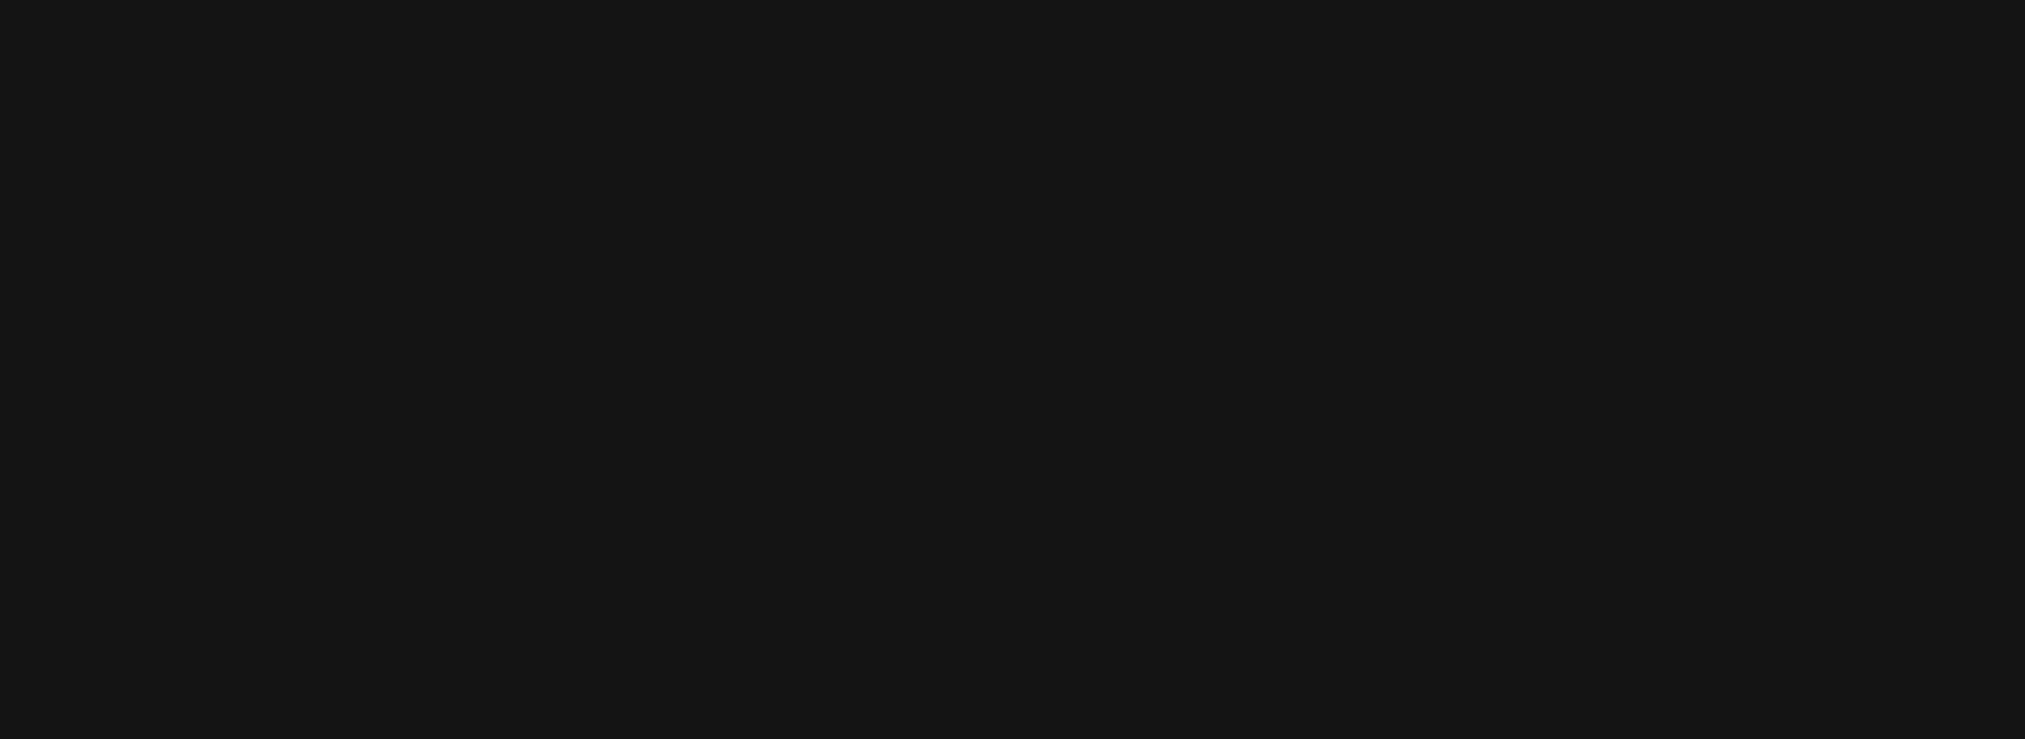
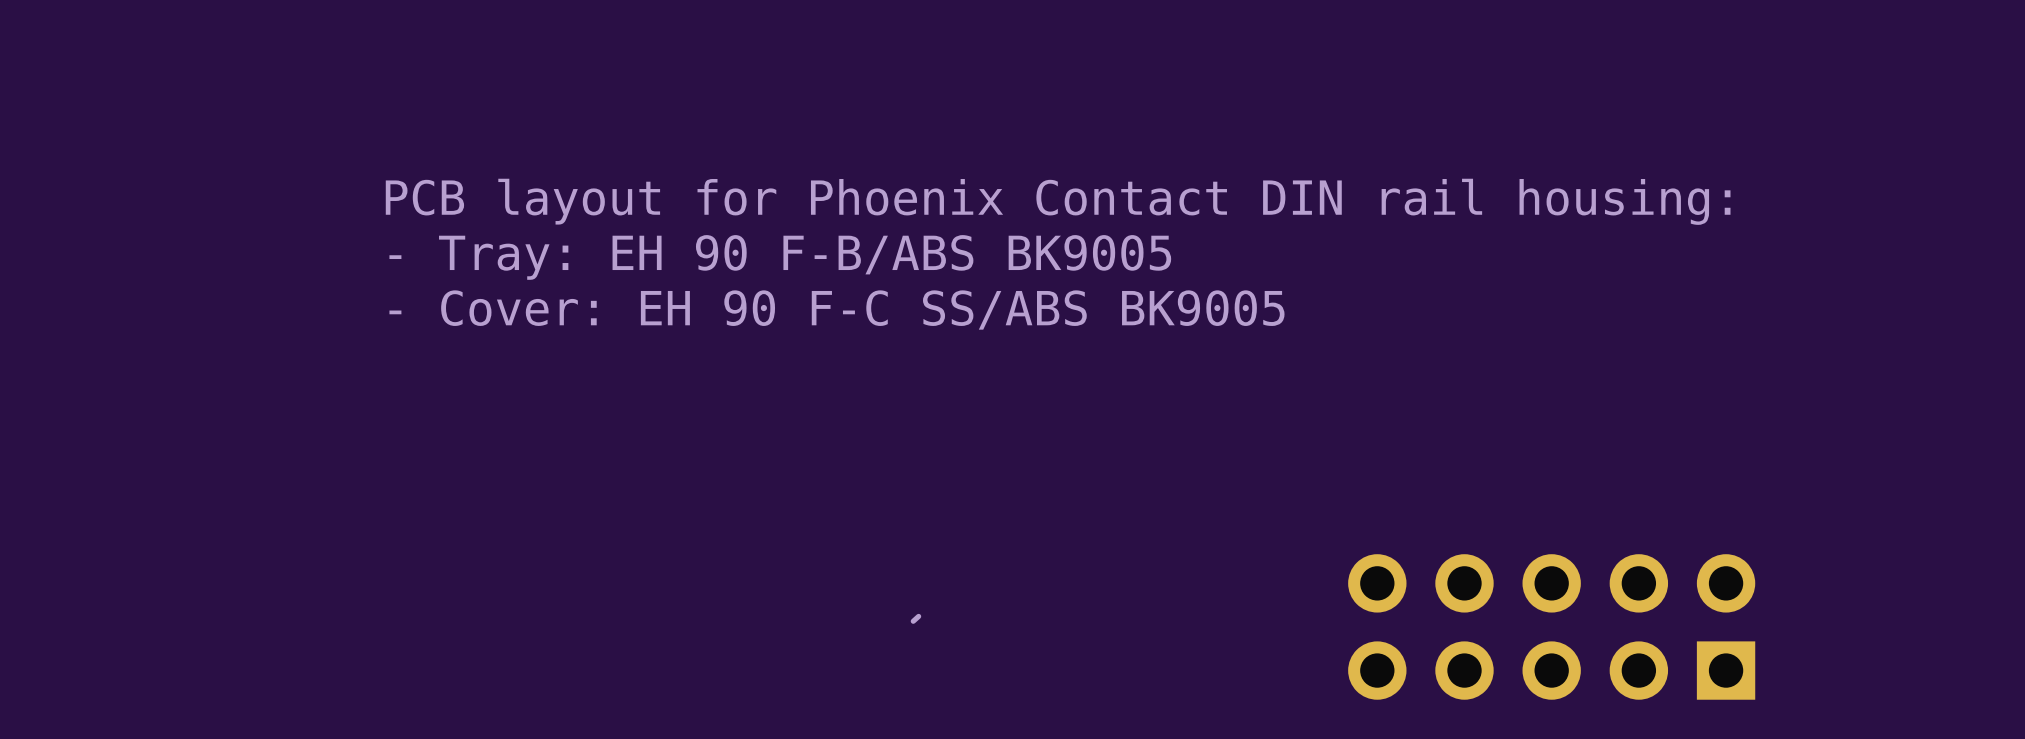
text: none -> PCB layout for Phoenix Contact DIN rail housing: (1058, 201)
text: none -> - Tray: EH 90 F-B/ABS BK9005 (780, 257)
text: none -> - Cover: EH 90 F-C SS/ABS BK9005 (836, 310)
line: none -> (918, 616) (913, 621)
part: none -> (1551, 626)

